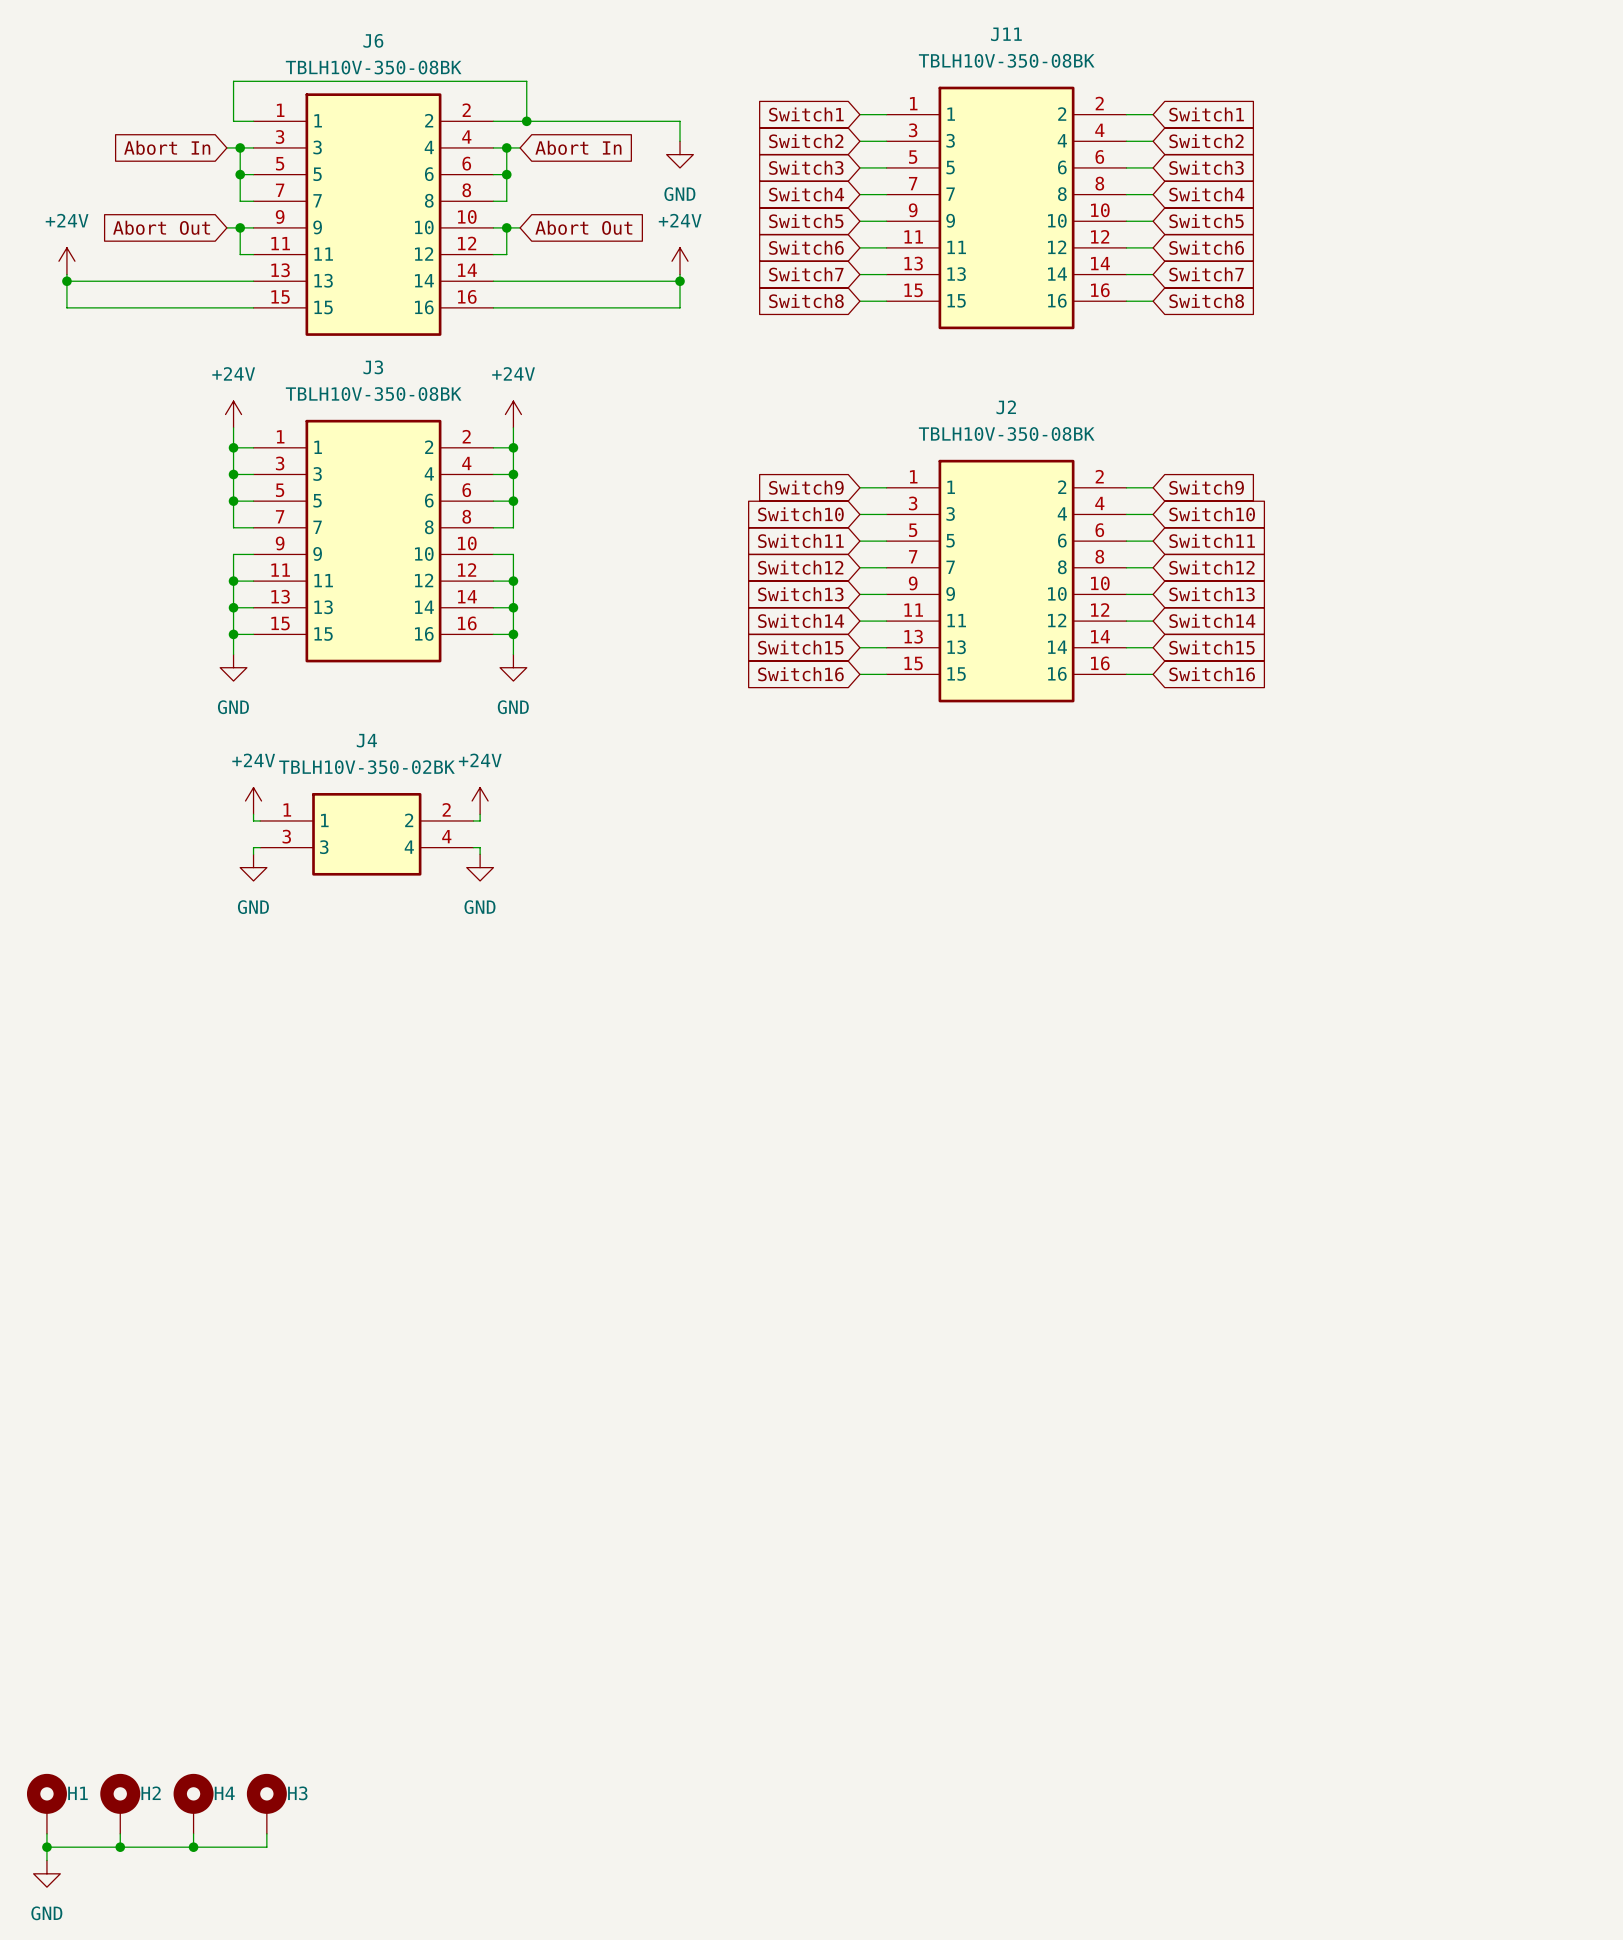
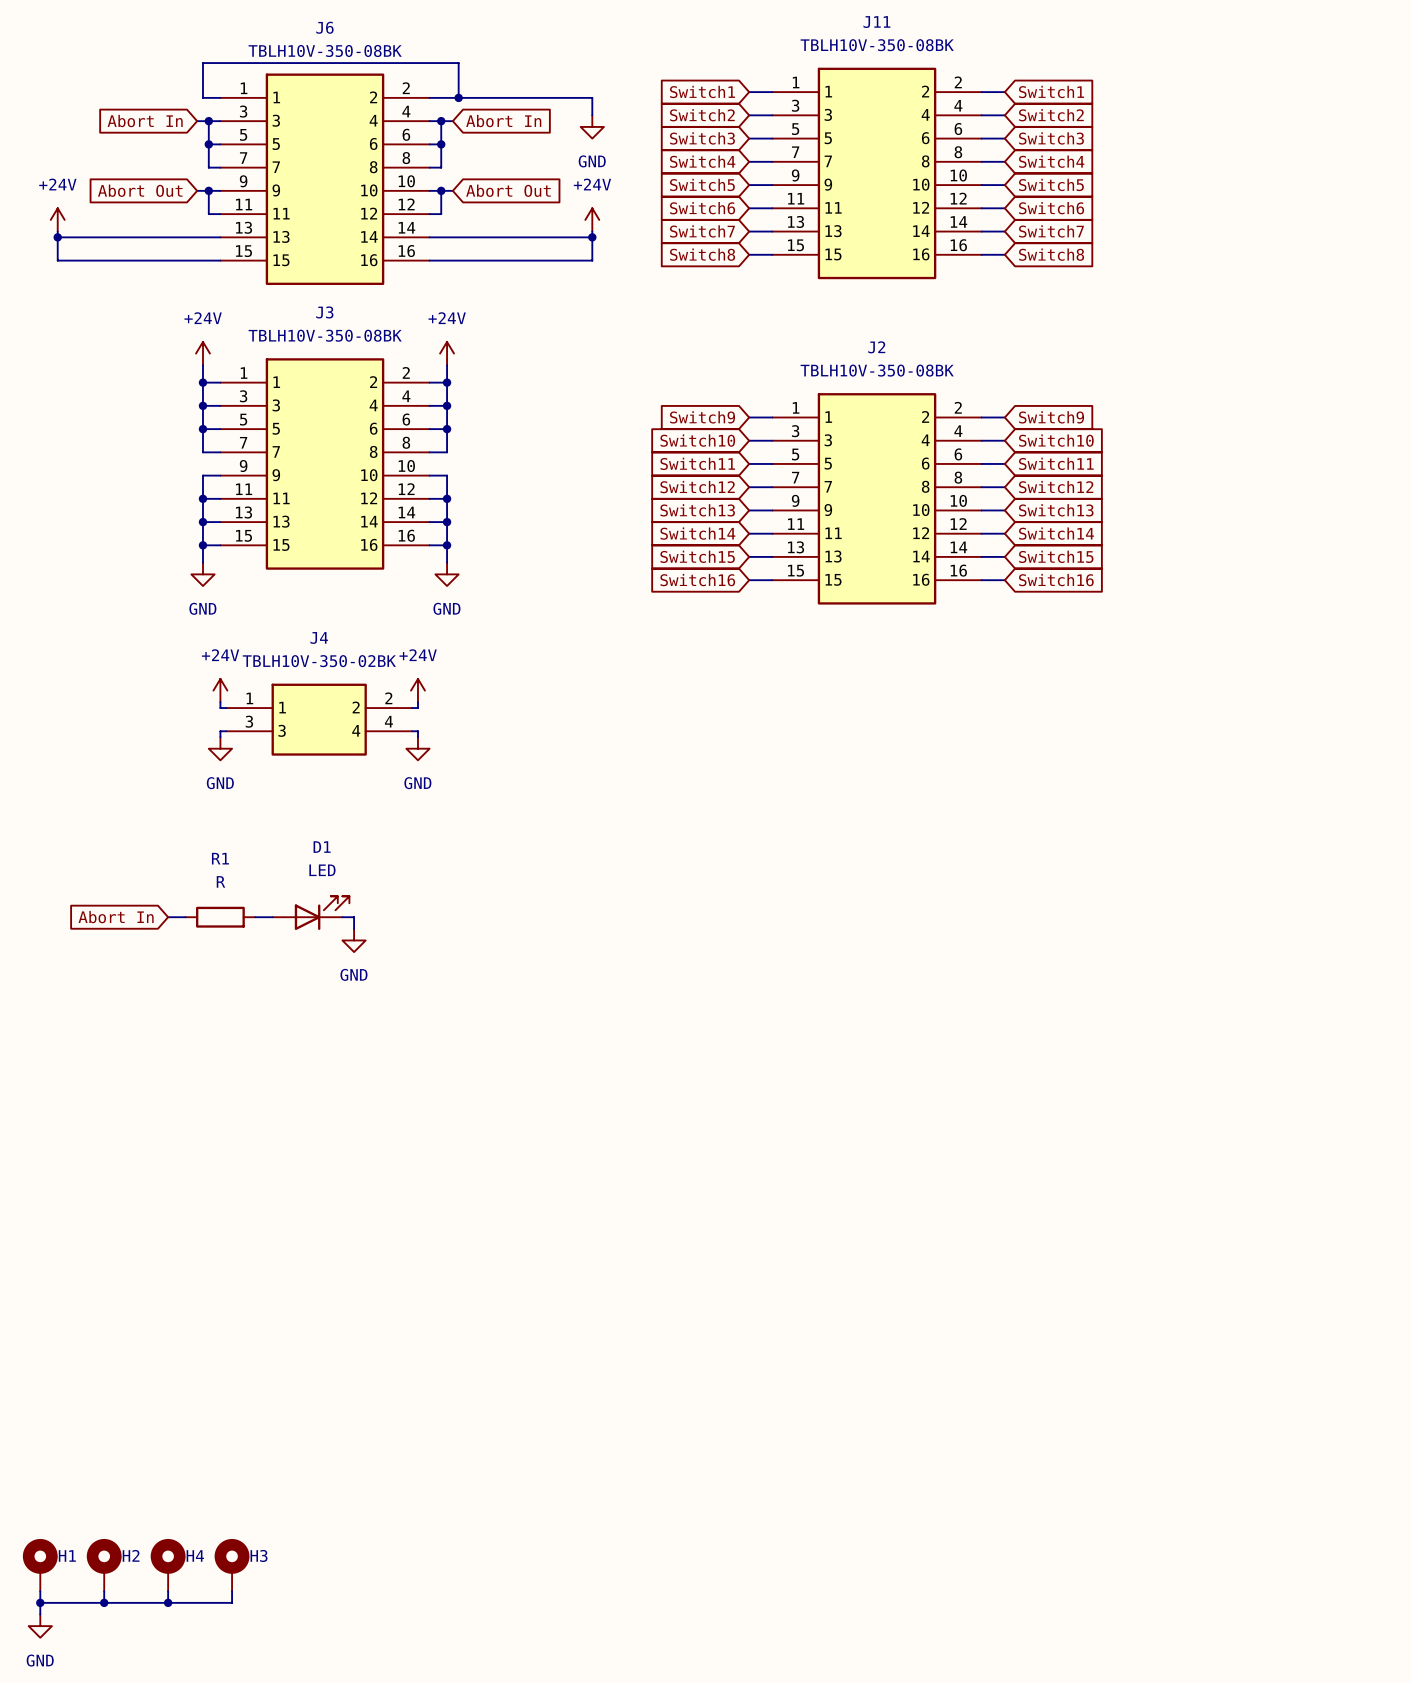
D1: none -> LED (311, 913)
global label: none -> Abort In (116, 917)
wire: none -> (168, 917) (185, 917)
R1: none -> R (220, 917)
wire: none -> (255, 917) (272, 917)
wire: none -> (342, 917) (354, 917) (354, 928)
power symbol: none -> GND (354, 940)

